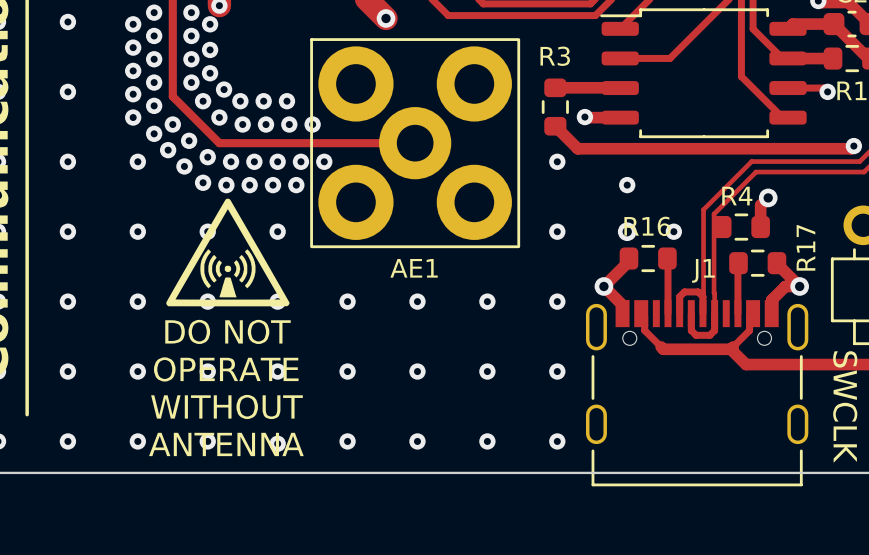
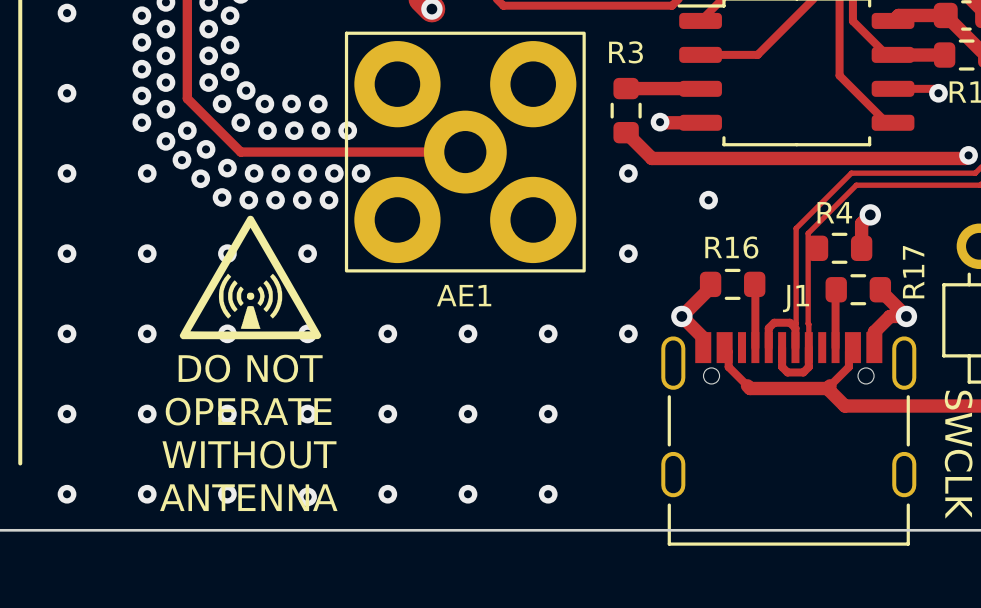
via: (627, 231) -> none
via: (673, 231) -> none
via: (557, 371) -> none
via: (557, 441) -> none

